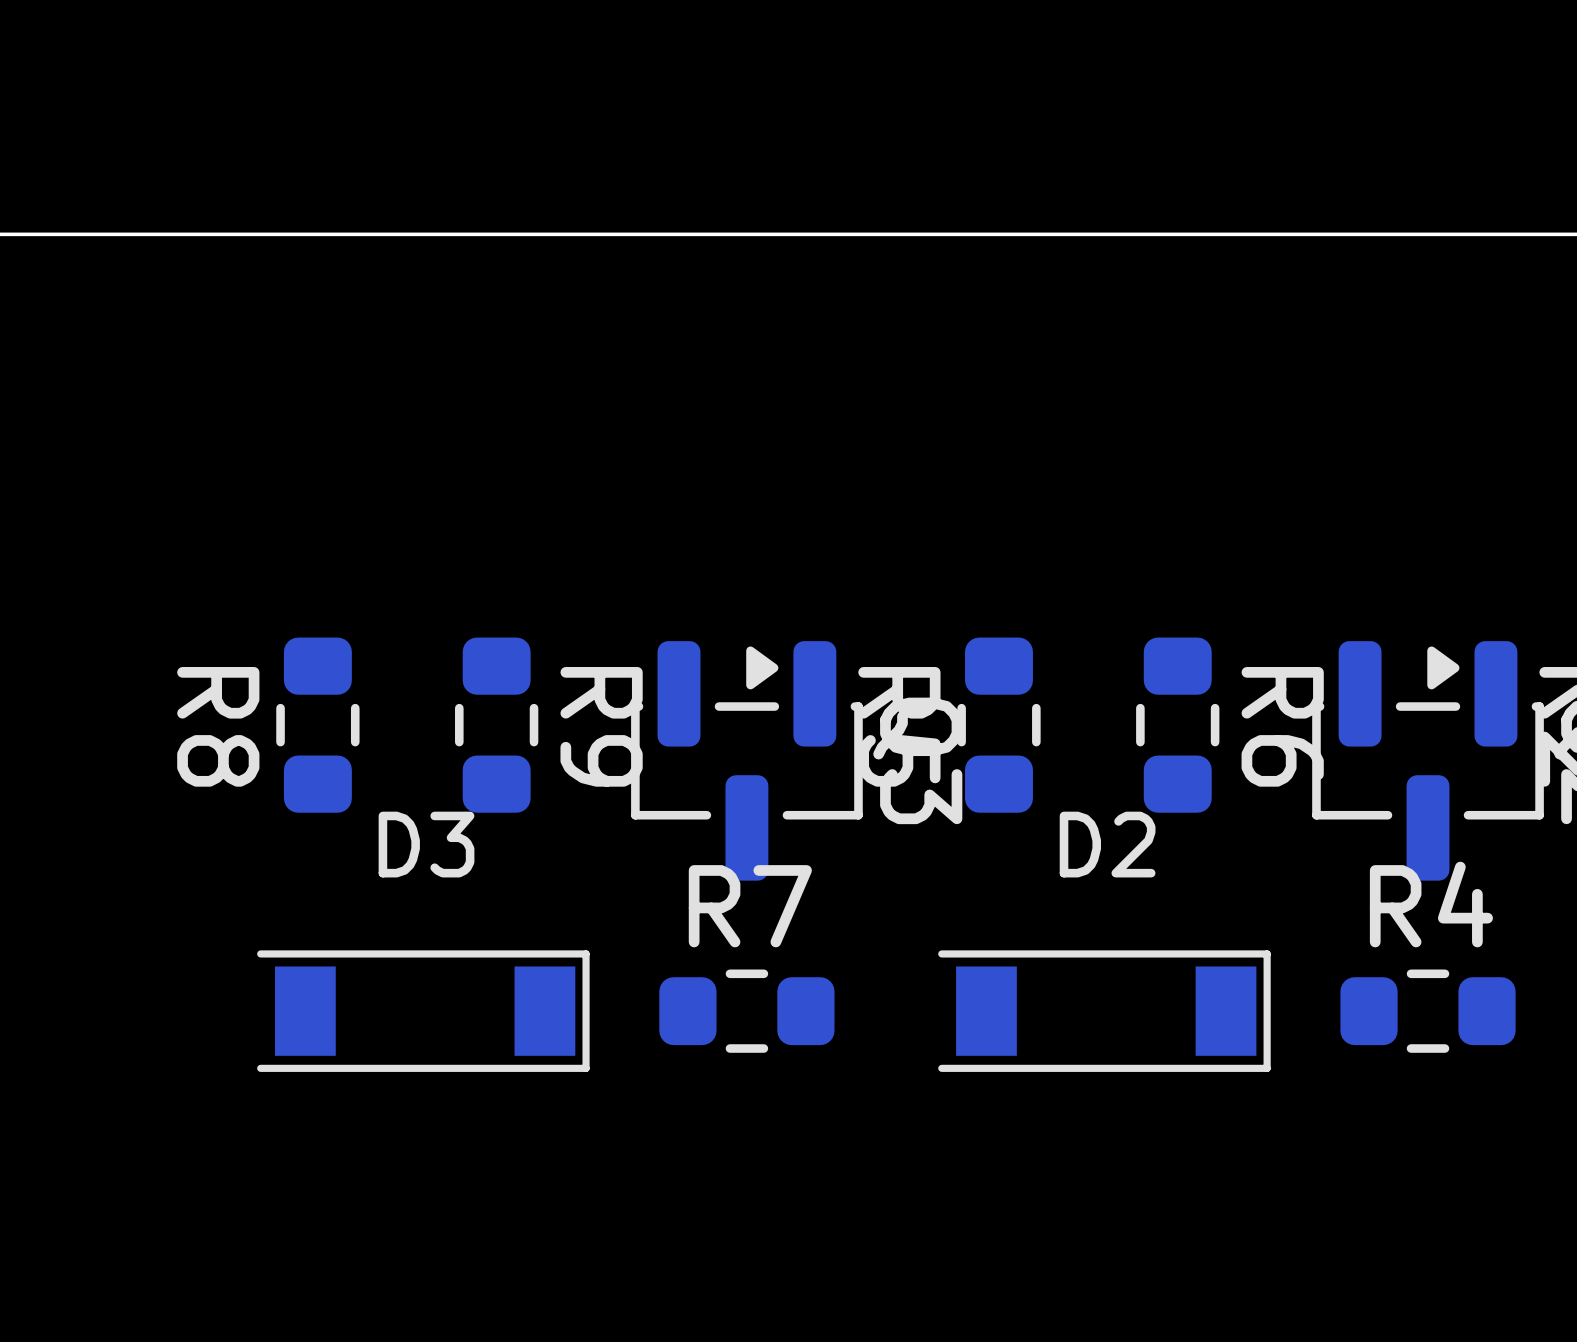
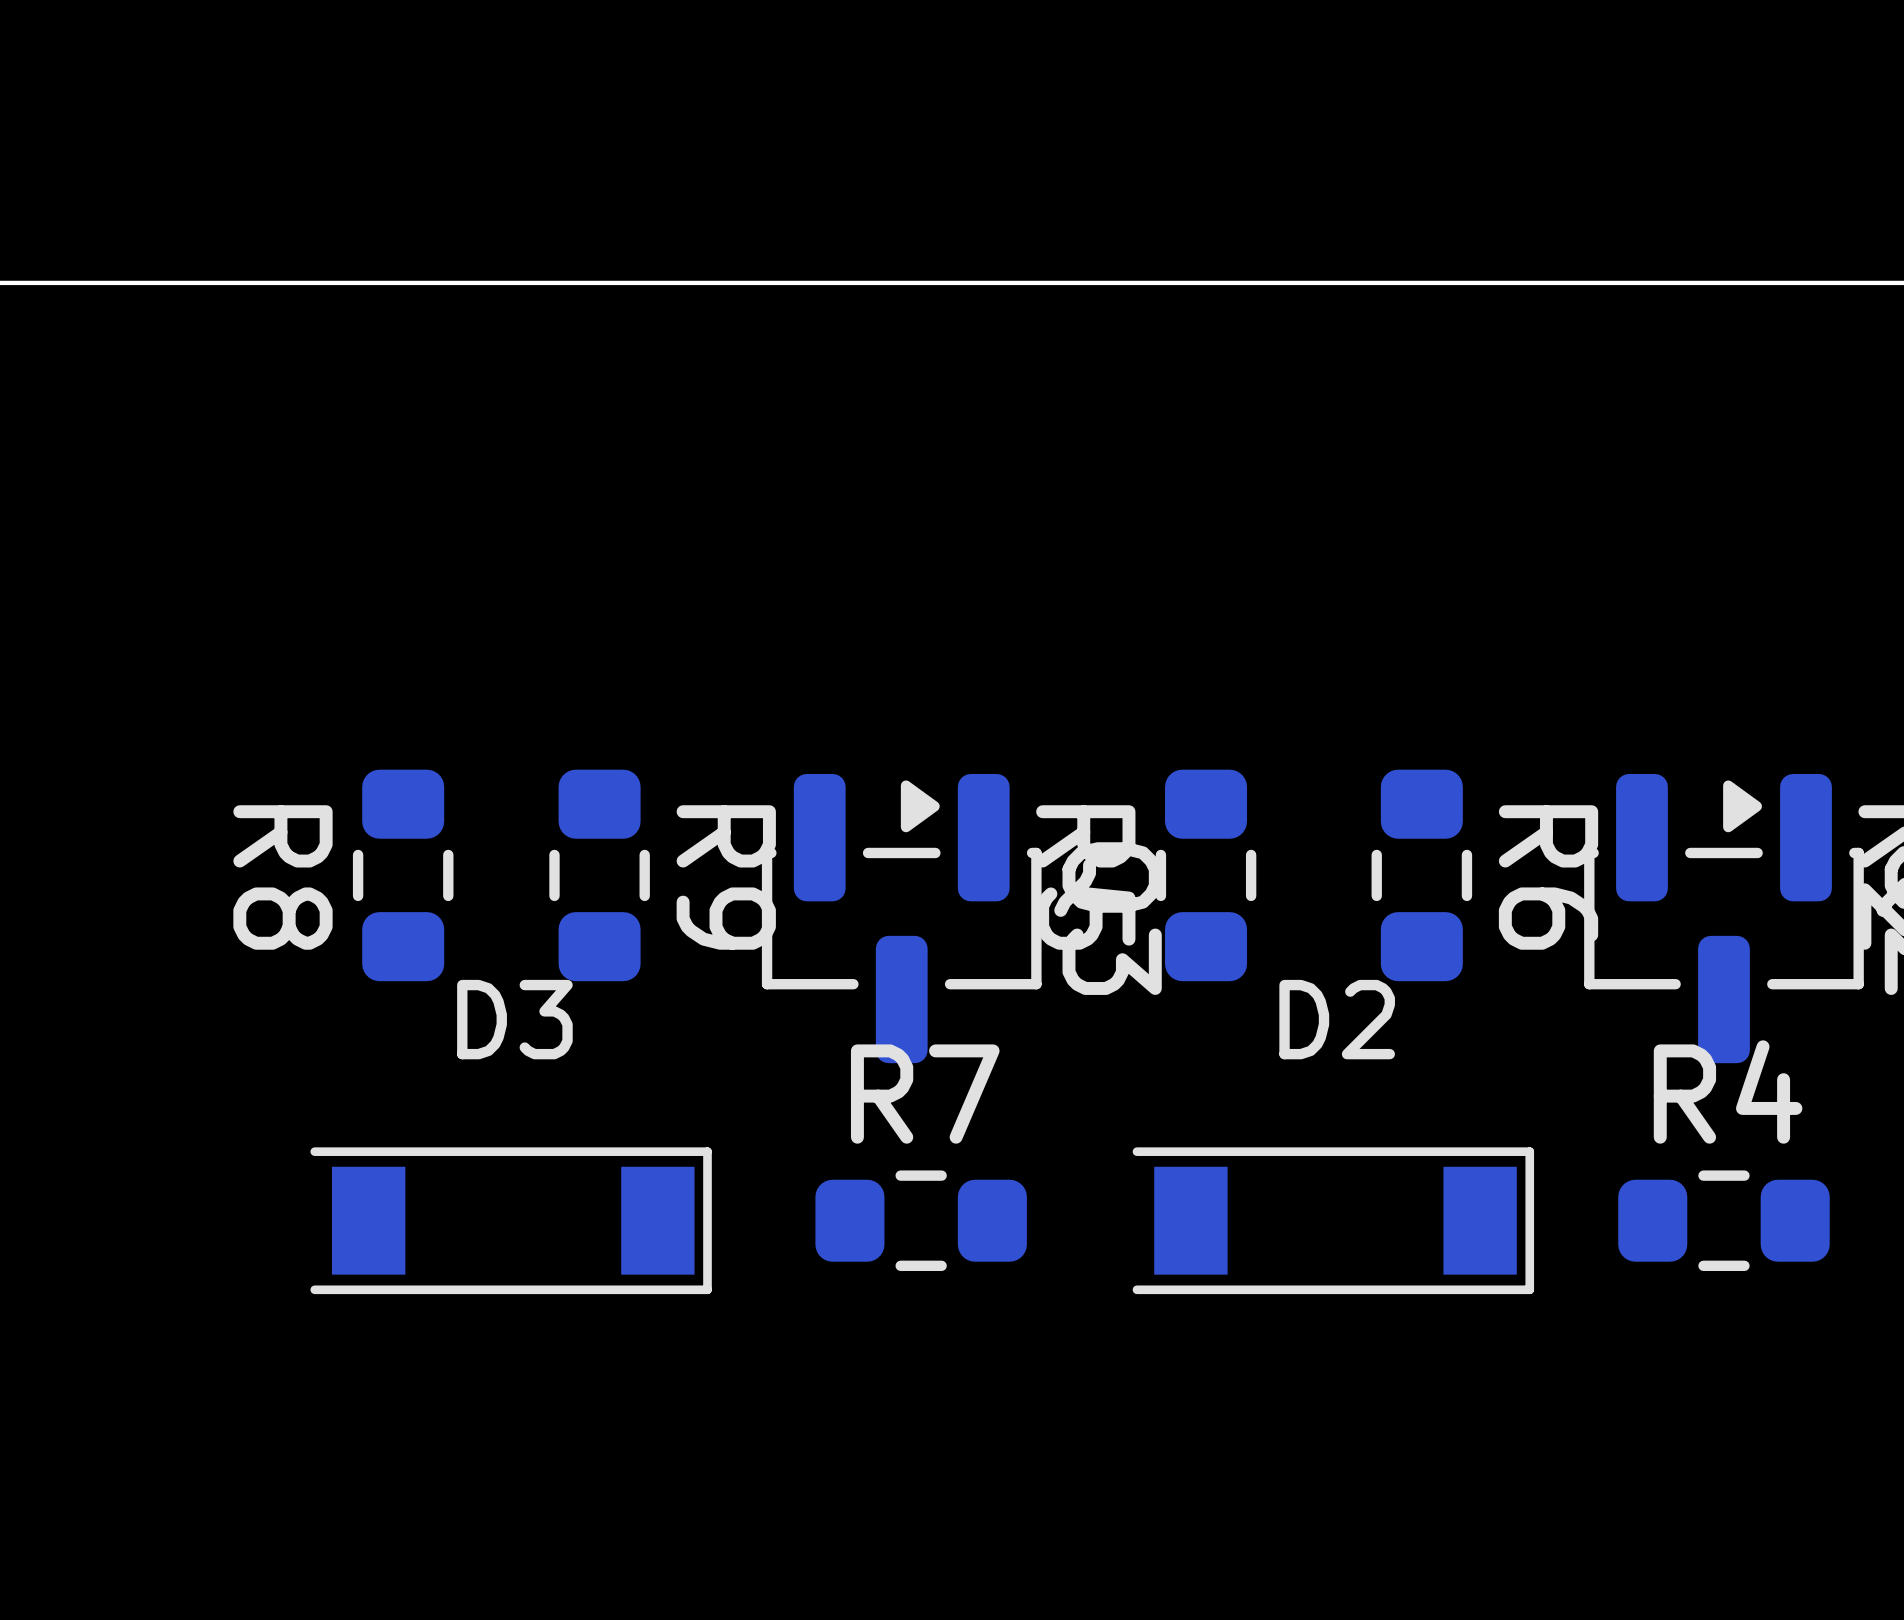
R8 position: (317, 725) -> (403, 875)
R7 position: (746, 1011) -> (921, 1220)

